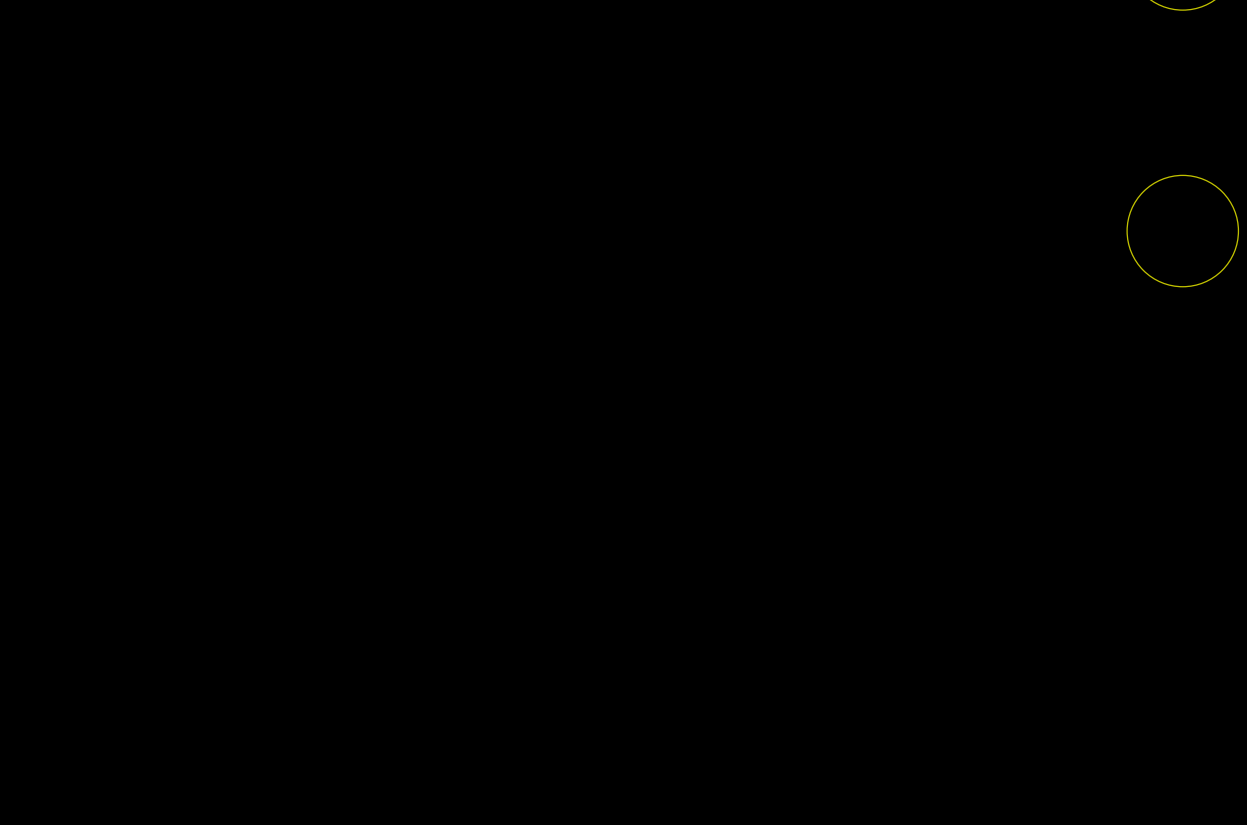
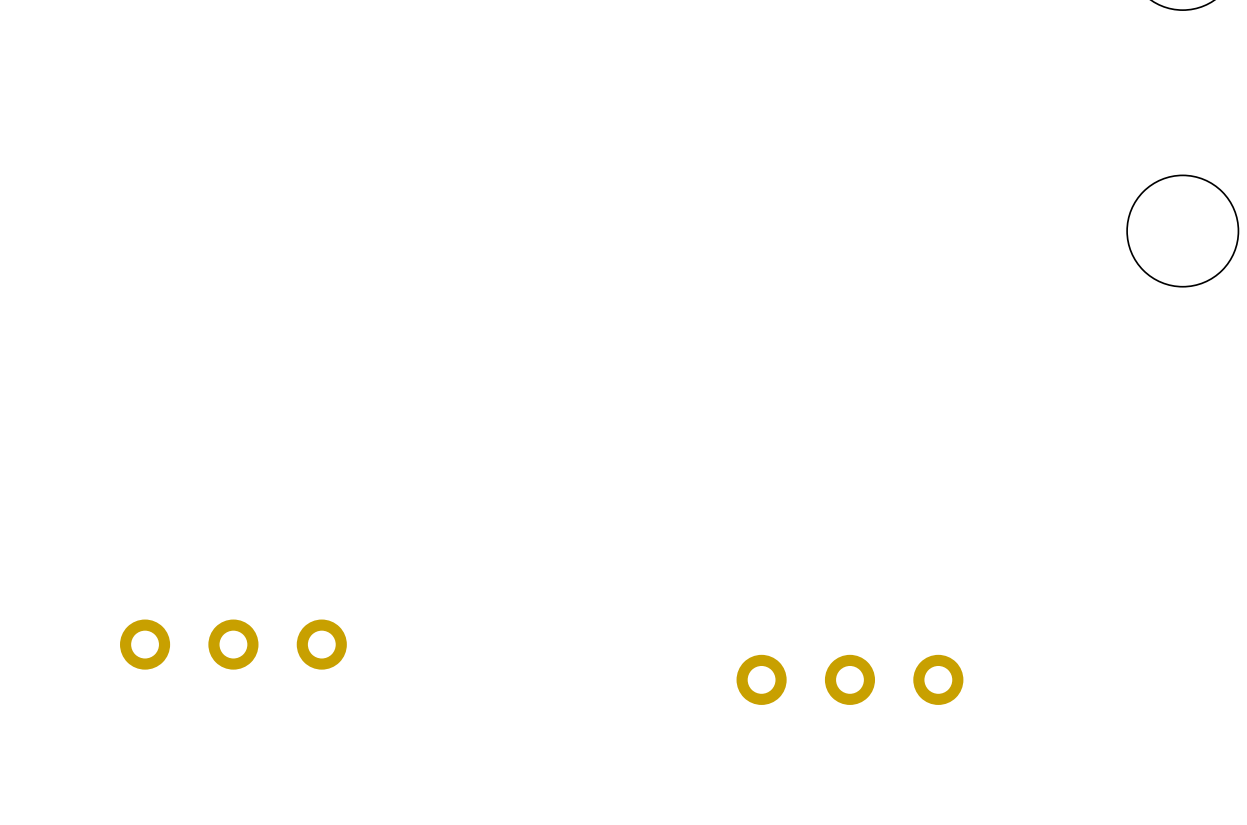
part: none -> (233, 644)
part: none -> (849, 679)

